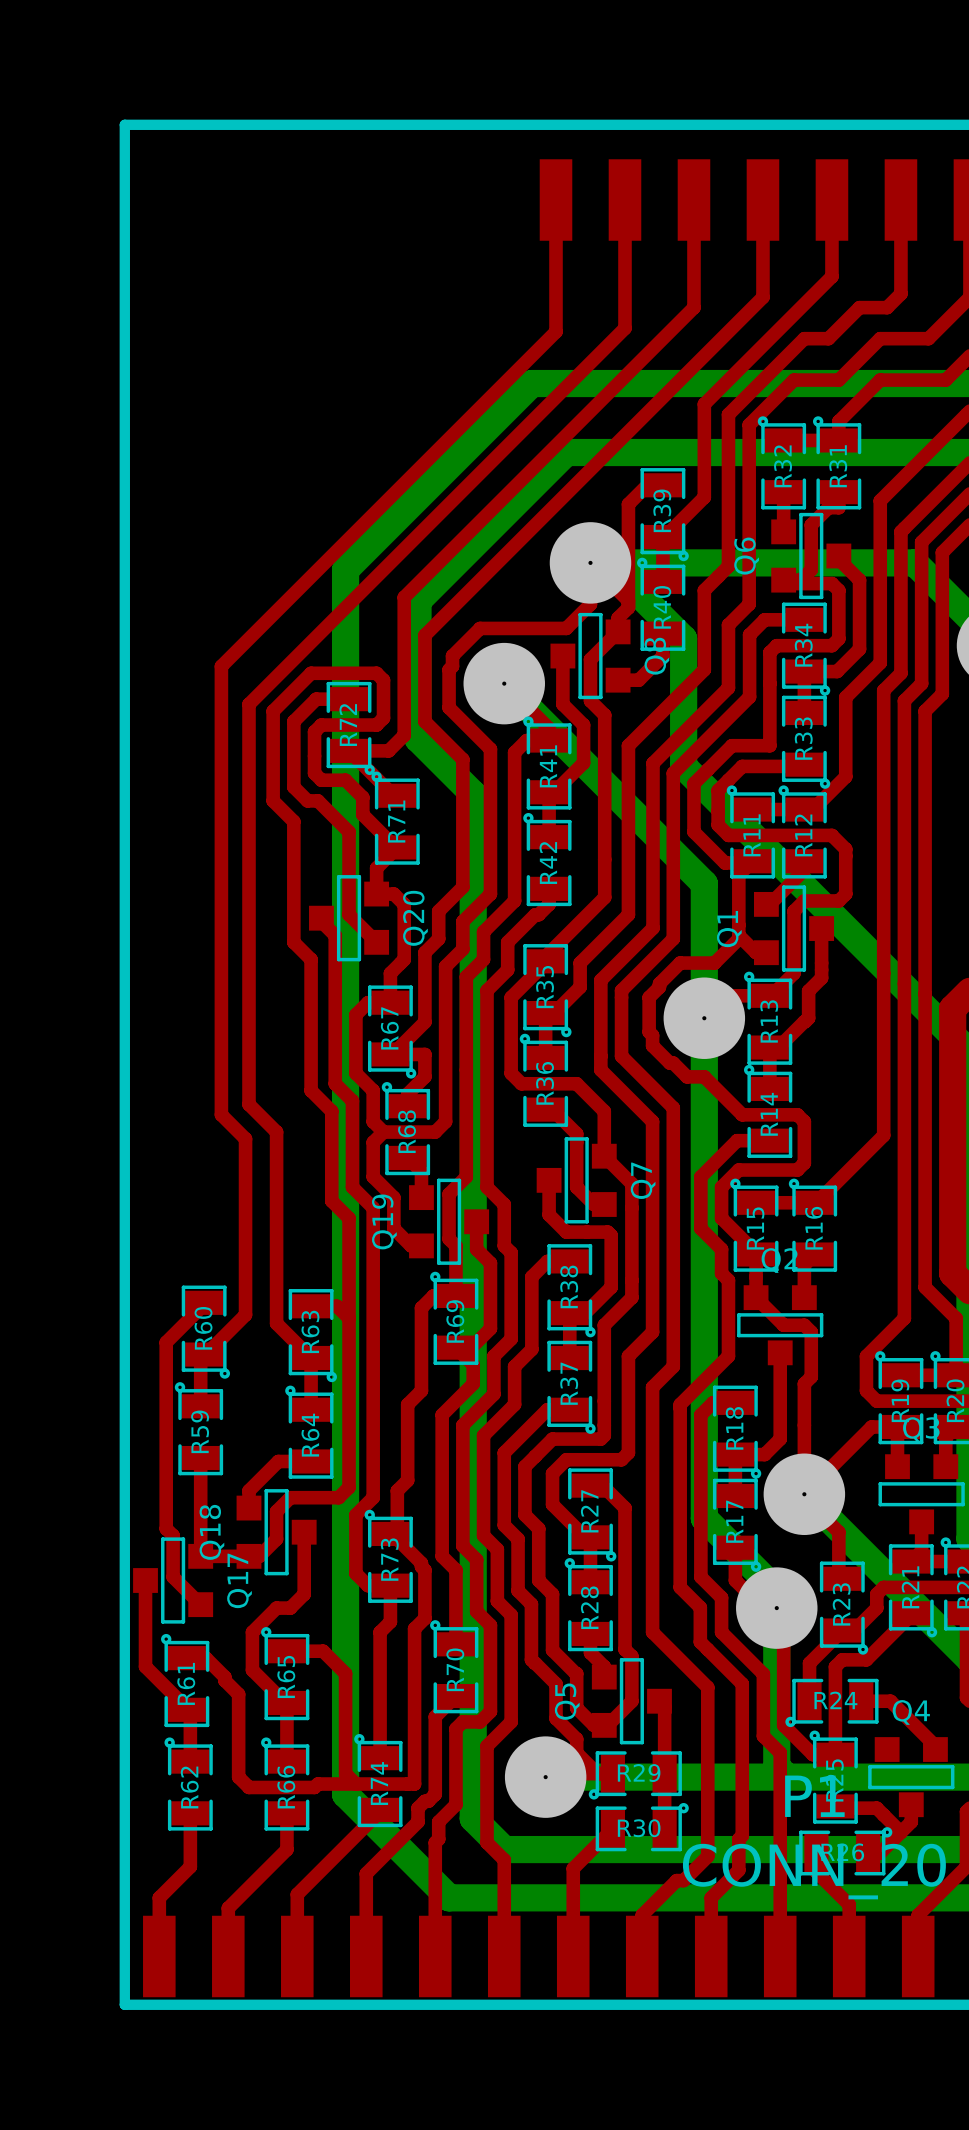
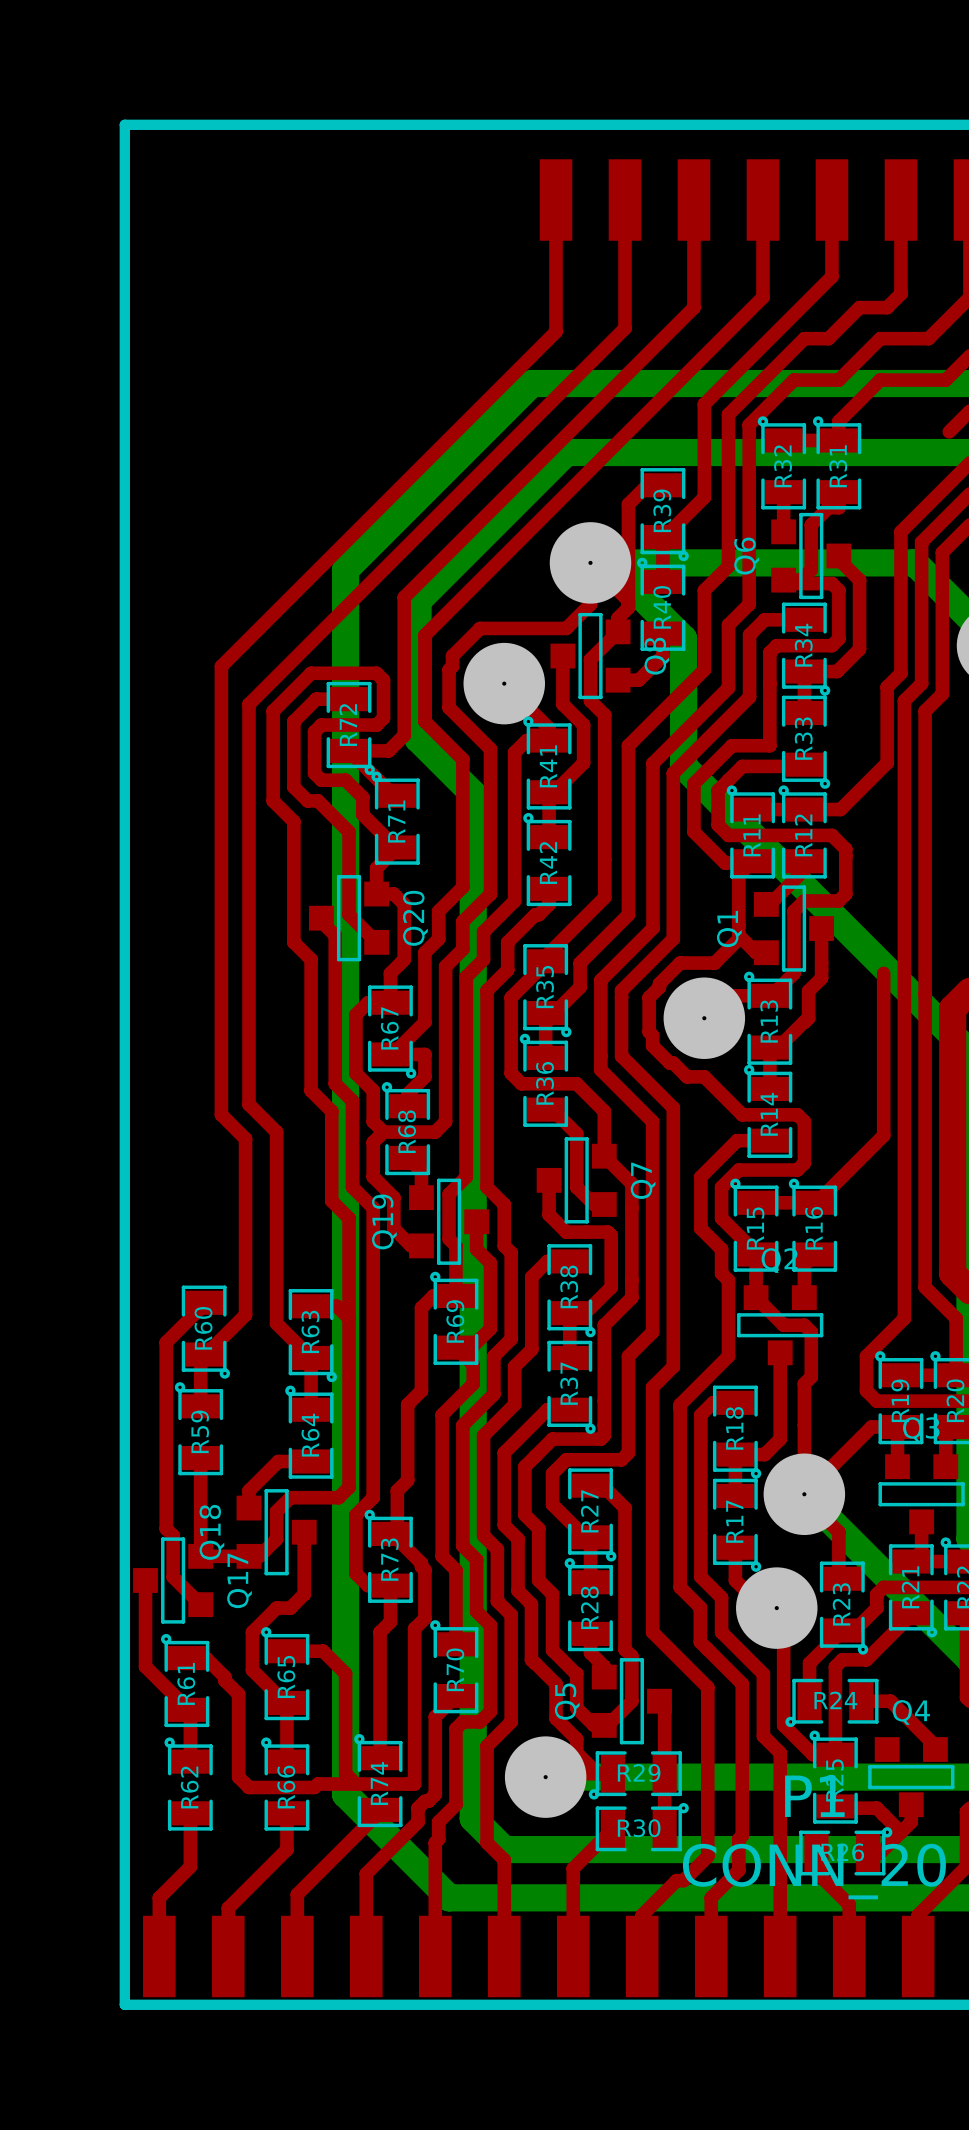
top track: (949, 431) (880, 500) (880, 662) (845, 697) (845, 776) (812, 809) -> none
bottom track: (504, 683) (704, 883) (704, 1518) (776, 1590) (776, 1766) (787, 1777) -> none
top track: (887, 687) (883, 690) (883, 973) -> (887, 687) (887, 762) (840, 809) (812, 809)

